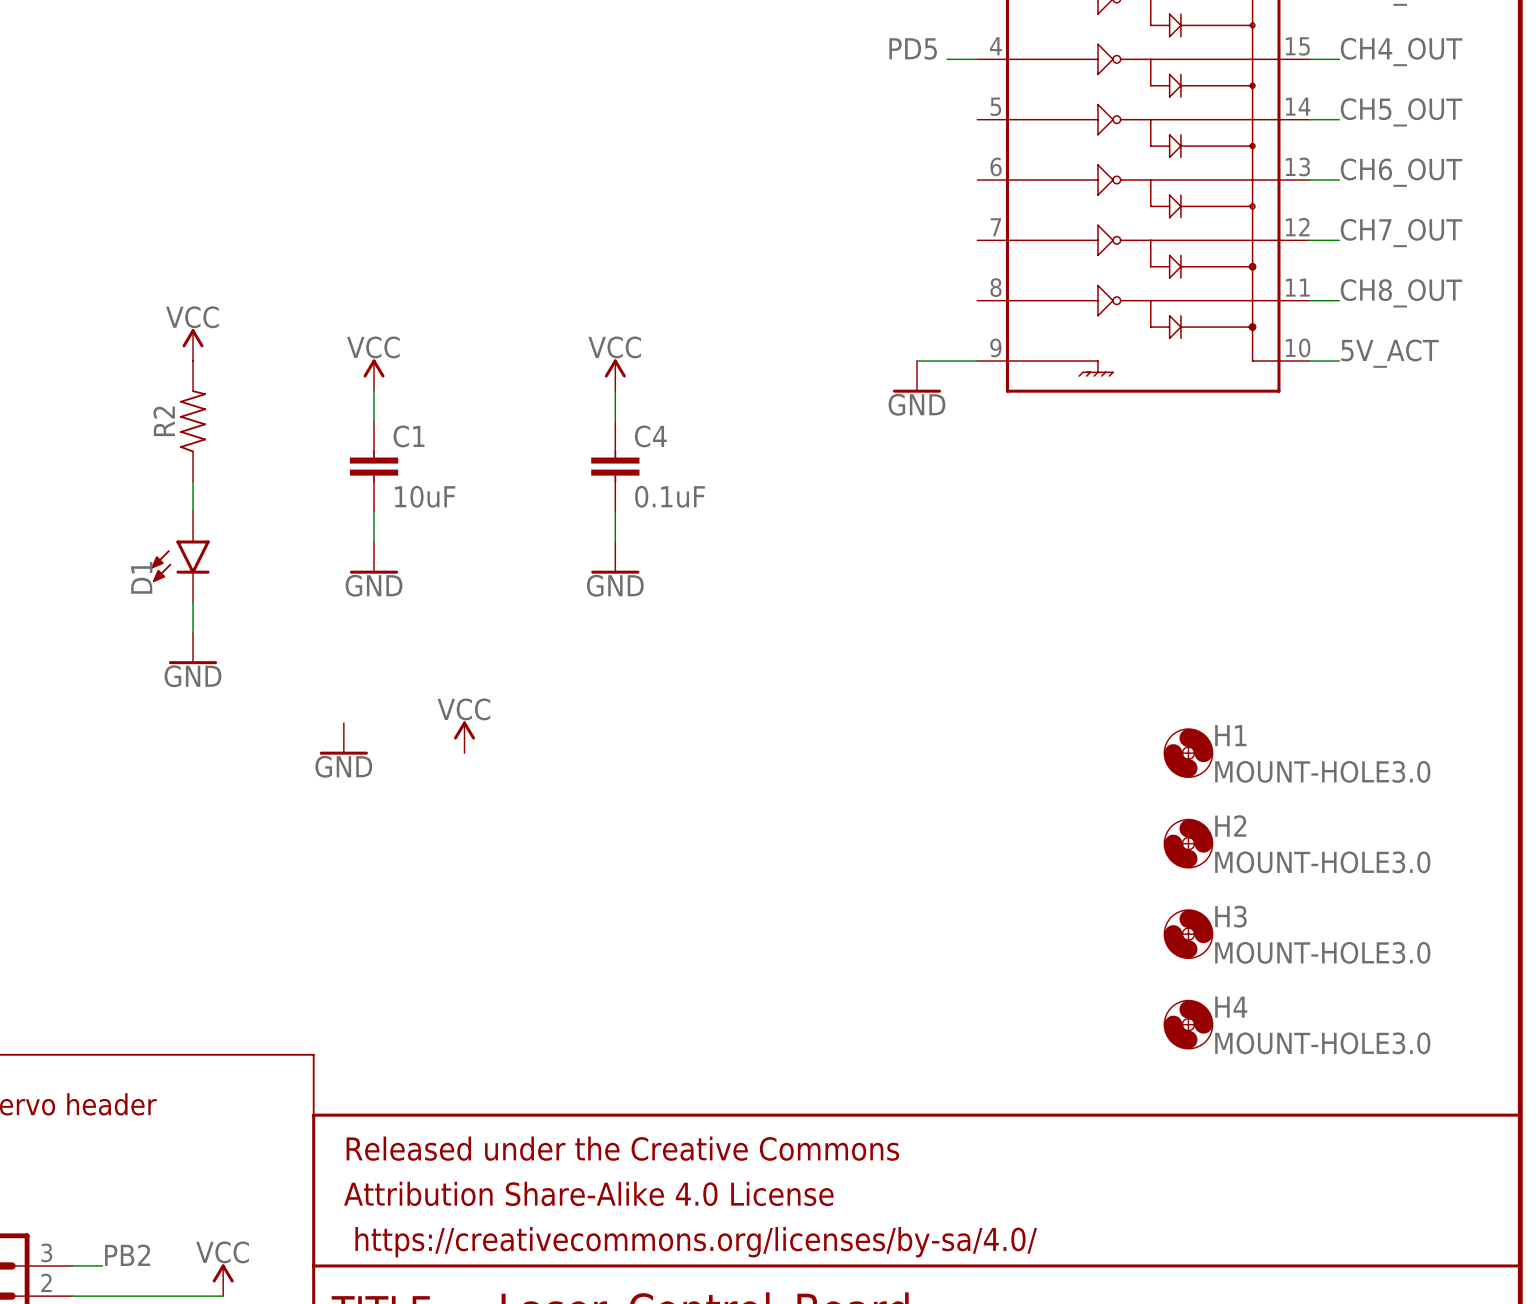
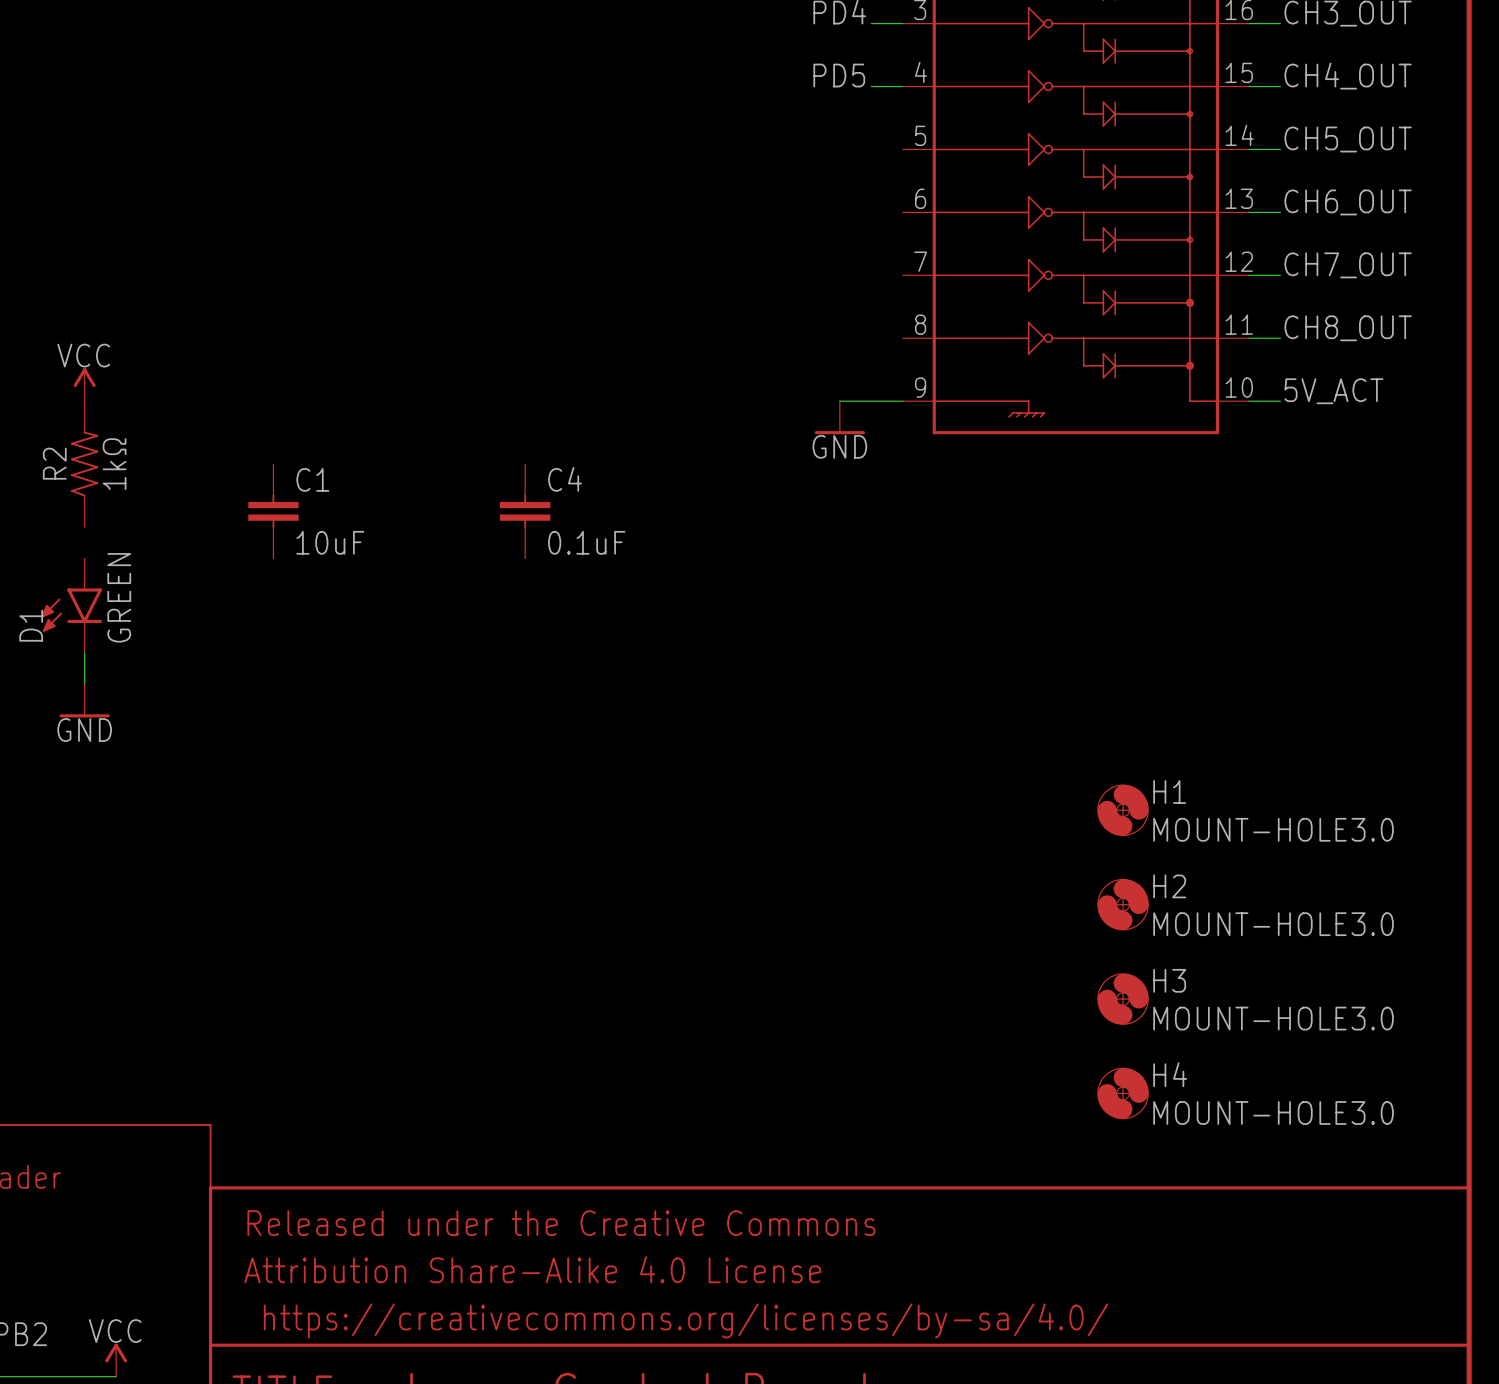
power symbol: VCC (374, 375) -> none
power symbol: VCC (615, 375) -> none
wire: (374, 391) (374, 421) -> none
wire: (615, 391) (615, 421) -> none
R2 value: none -> 1kΩ (114, 464)
wire: (193, 481) (193, 511) -> none
wire: (374, 511) (374, 541) -> none
wire: (615, 511) (615, 541) -> none
D1 value: none -> GREEN (119, 597)
power symbol: GND (374, 557) -> none
power symbol: GND (615, 557) -> none
power symbol: VCC (464, 737) -> none
power symbol: GND (343, 738) -> none

